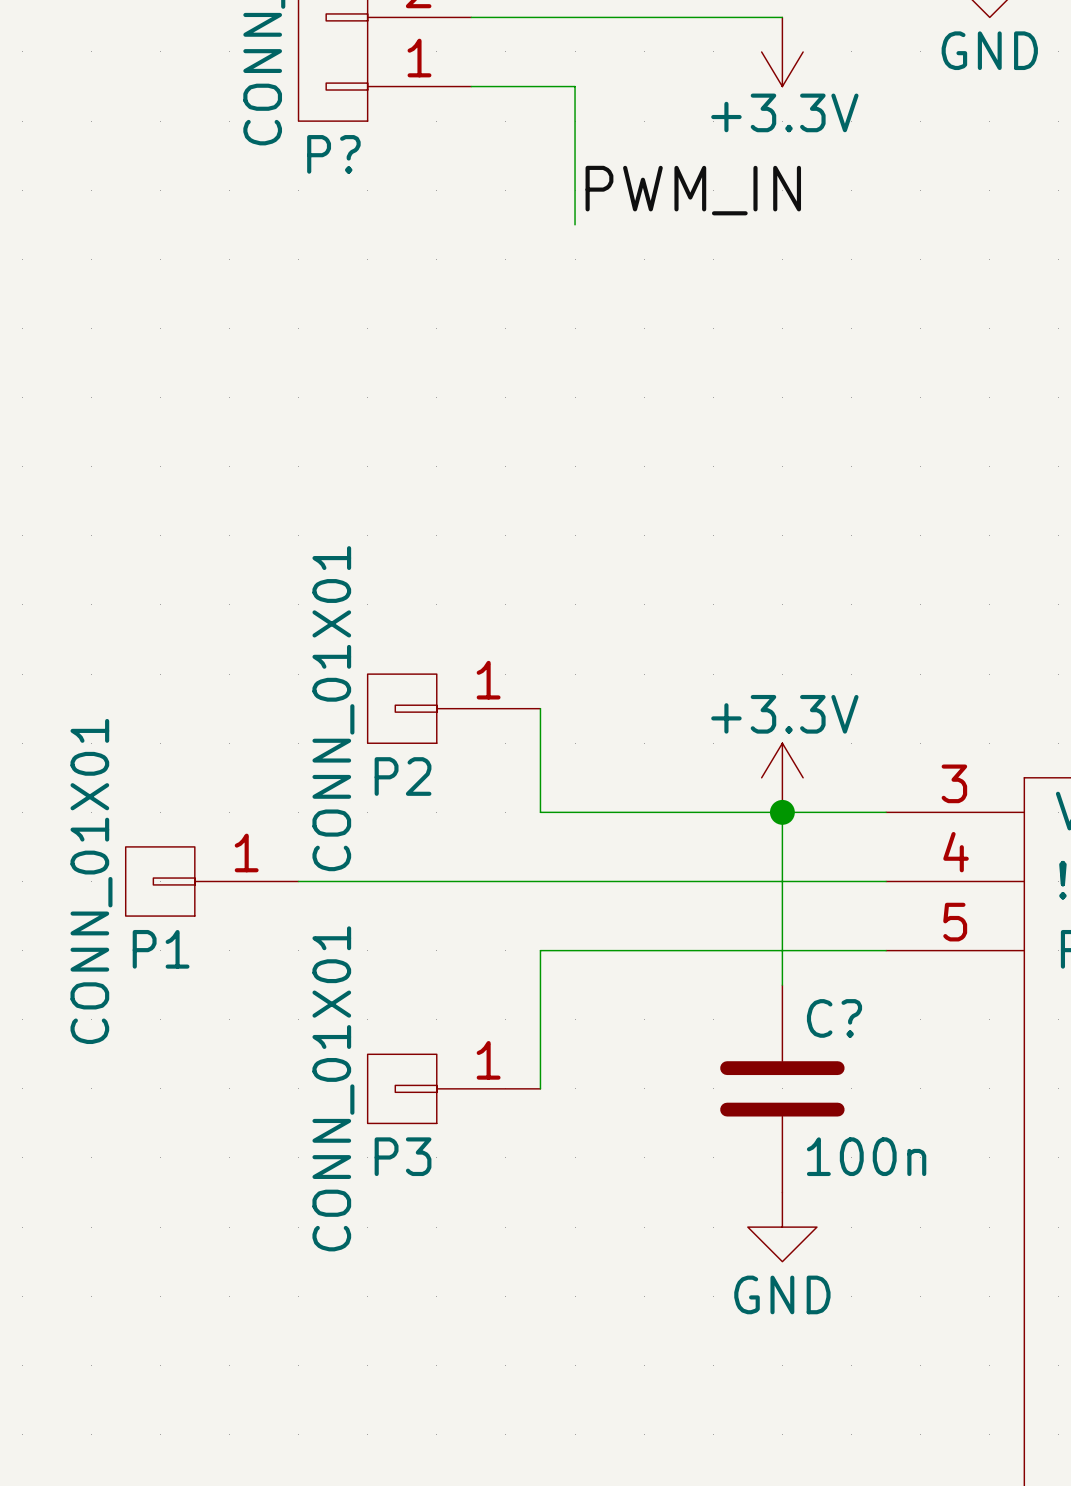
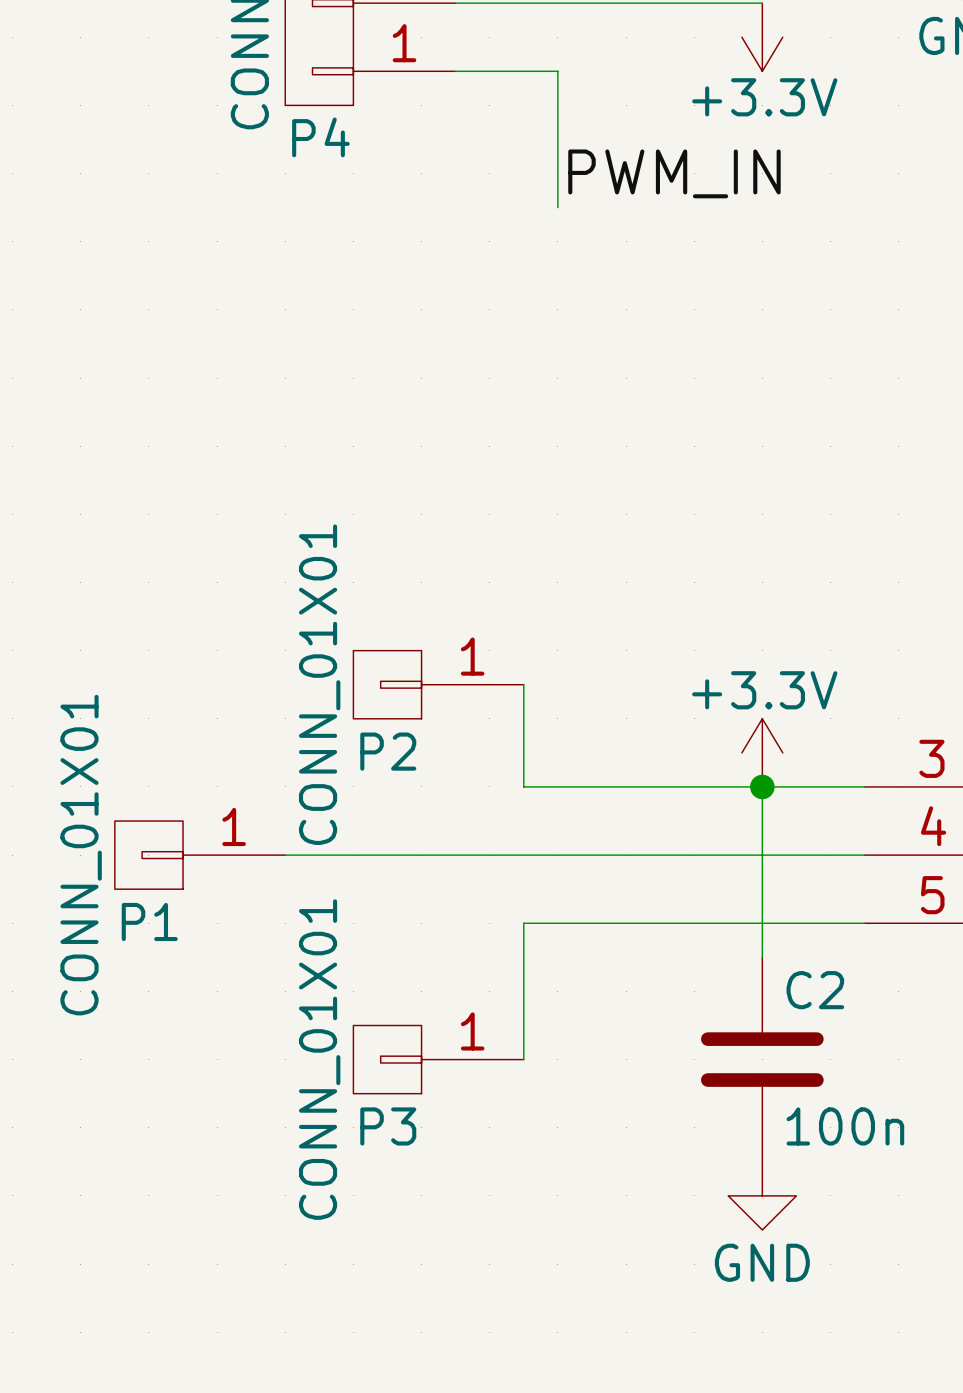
P? name: P? (333, 154) -> P4 (320, 137)
C? name: C? (834, 1018) -> C2 (815, 990)

